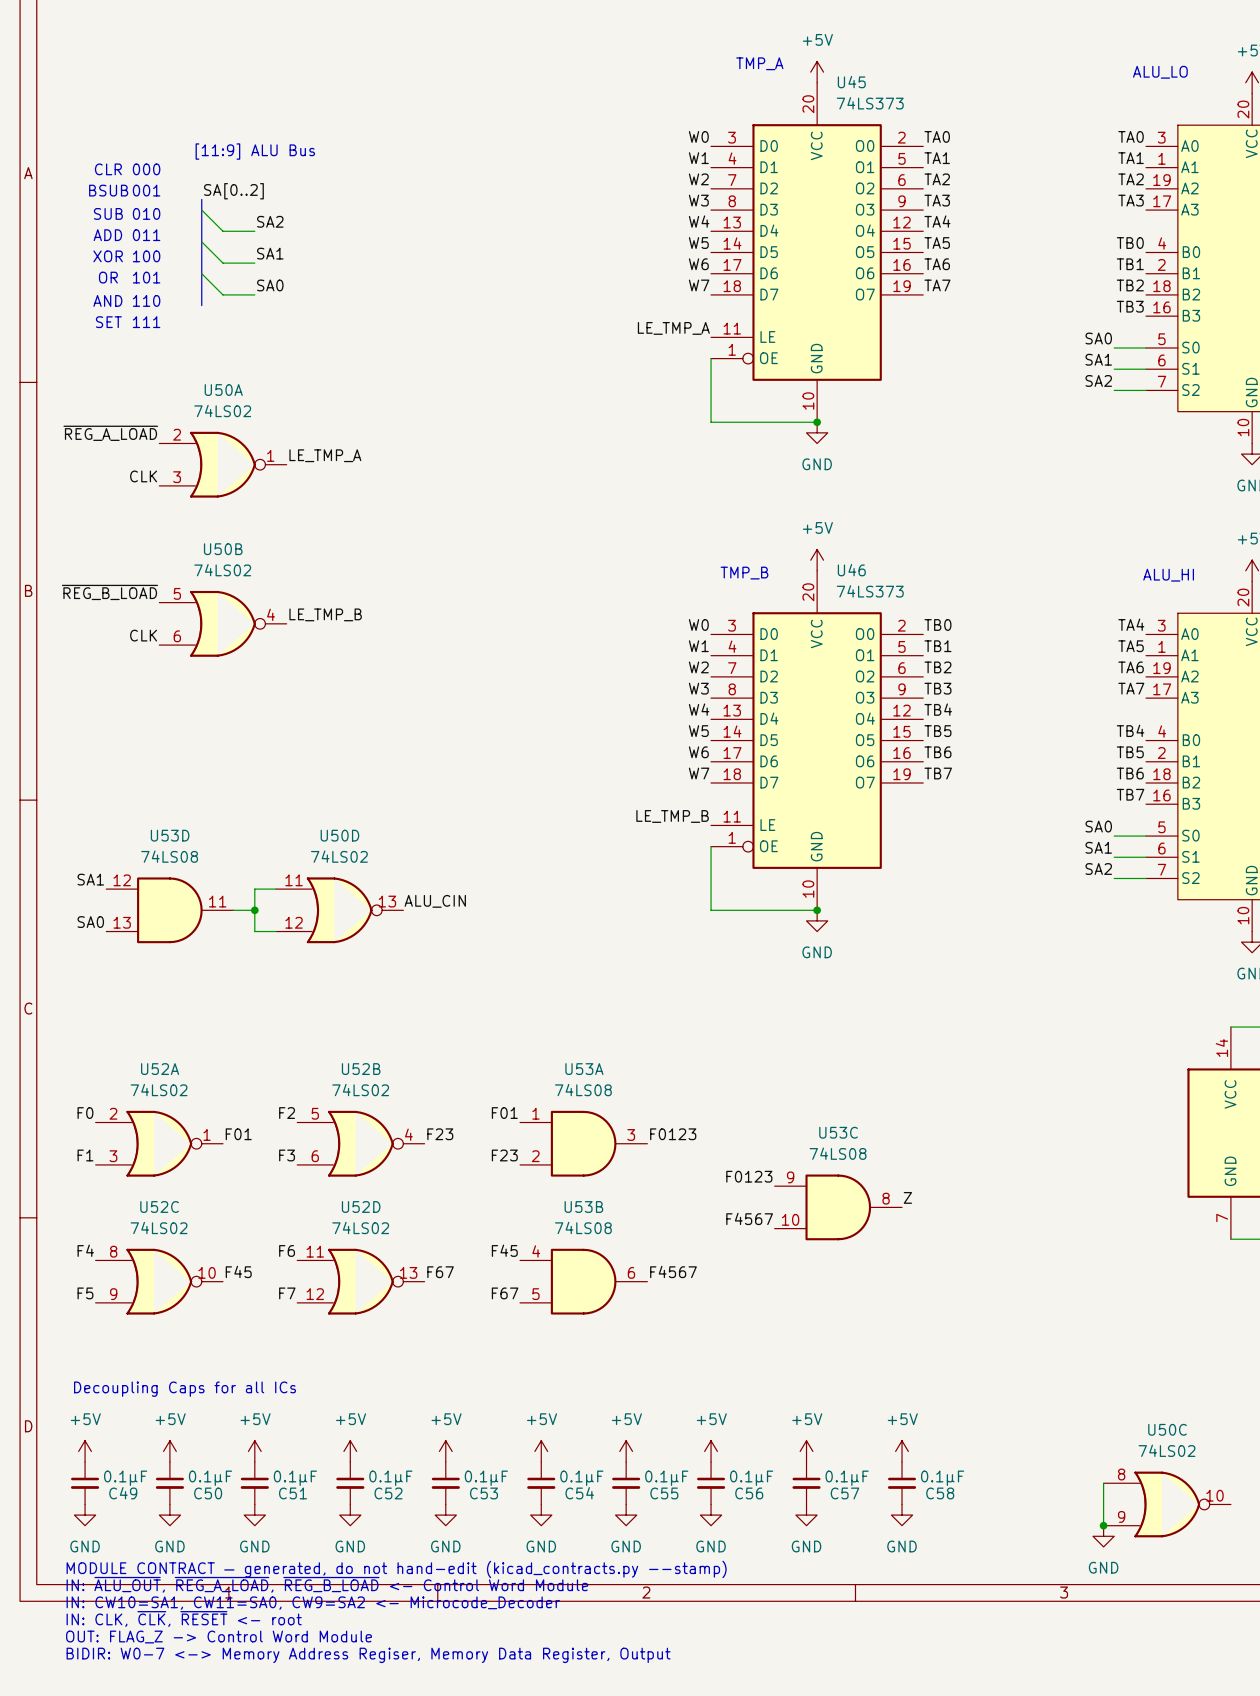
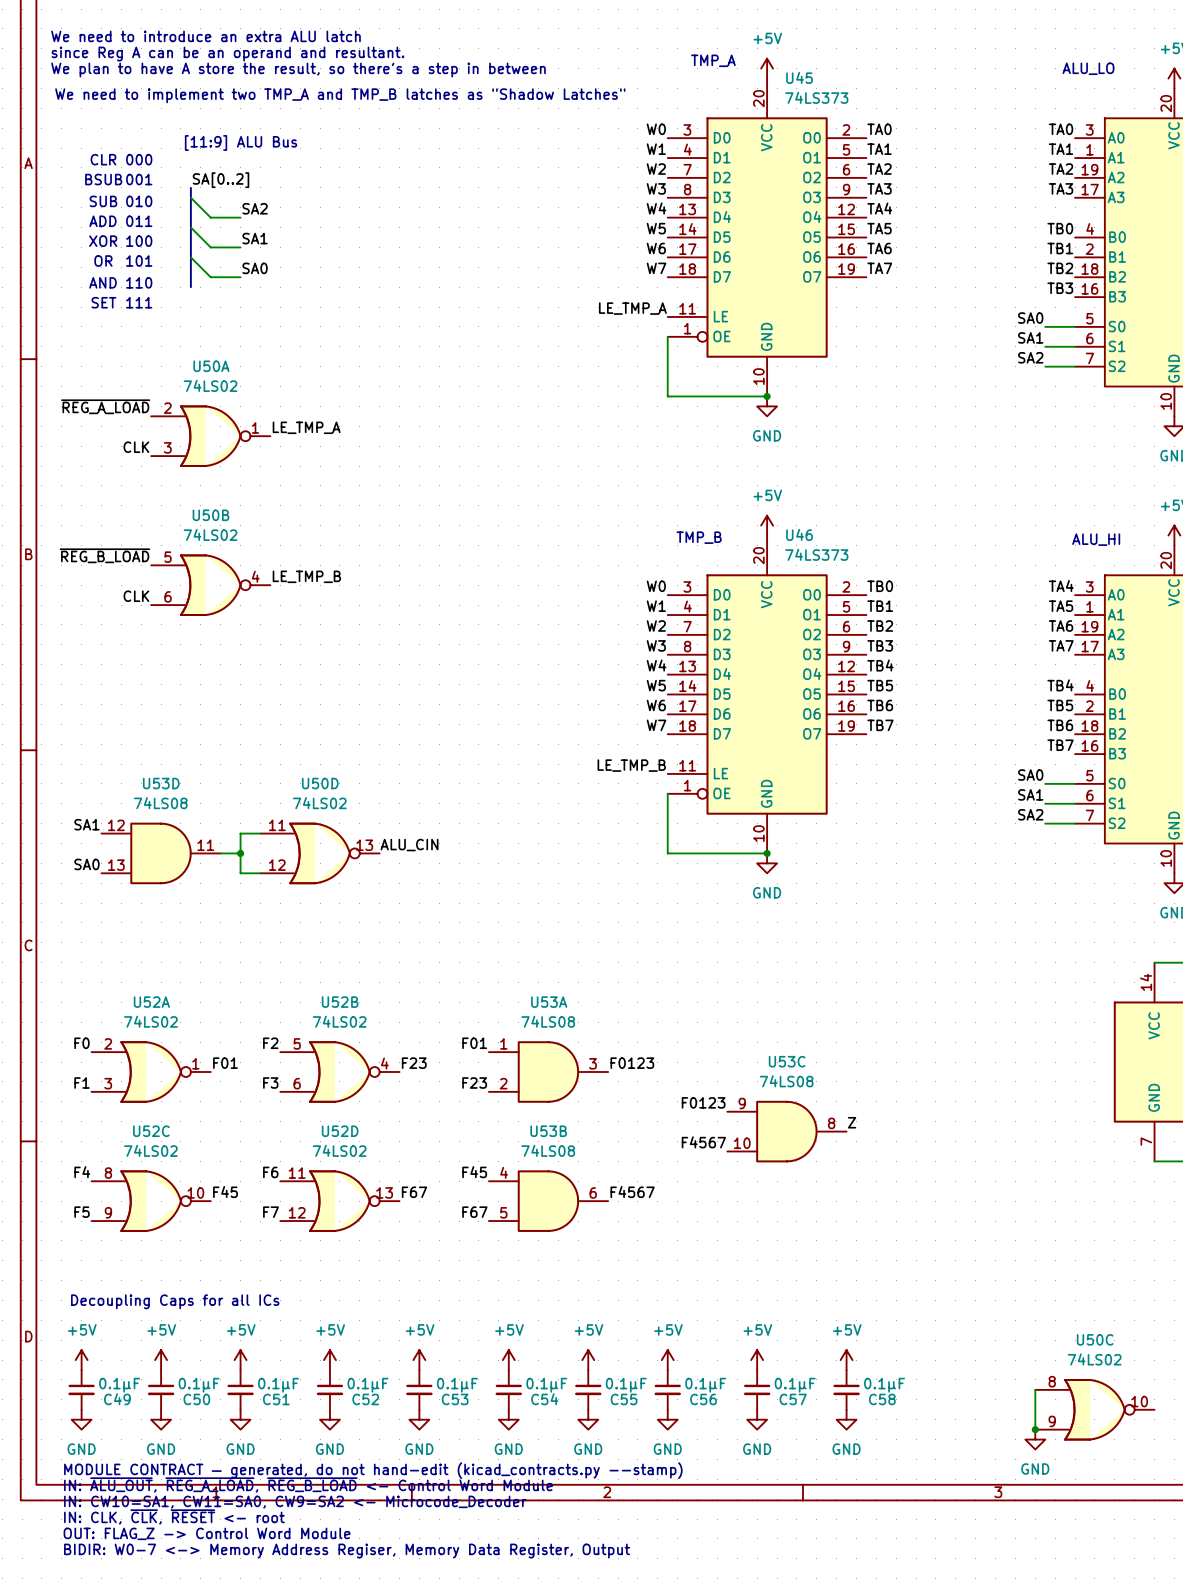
text: none -> We need to introduce an extra ALU latch (206, 36)
text: none -> since Reg A can be an operand and resultant. (228, 54)
text: none -> We plan to have A store the result, so there's a step in between (298, 70)
text: none -> We need to implement two TMP_A and TMP_B latches as "Shadow Latches" (340, 95)

